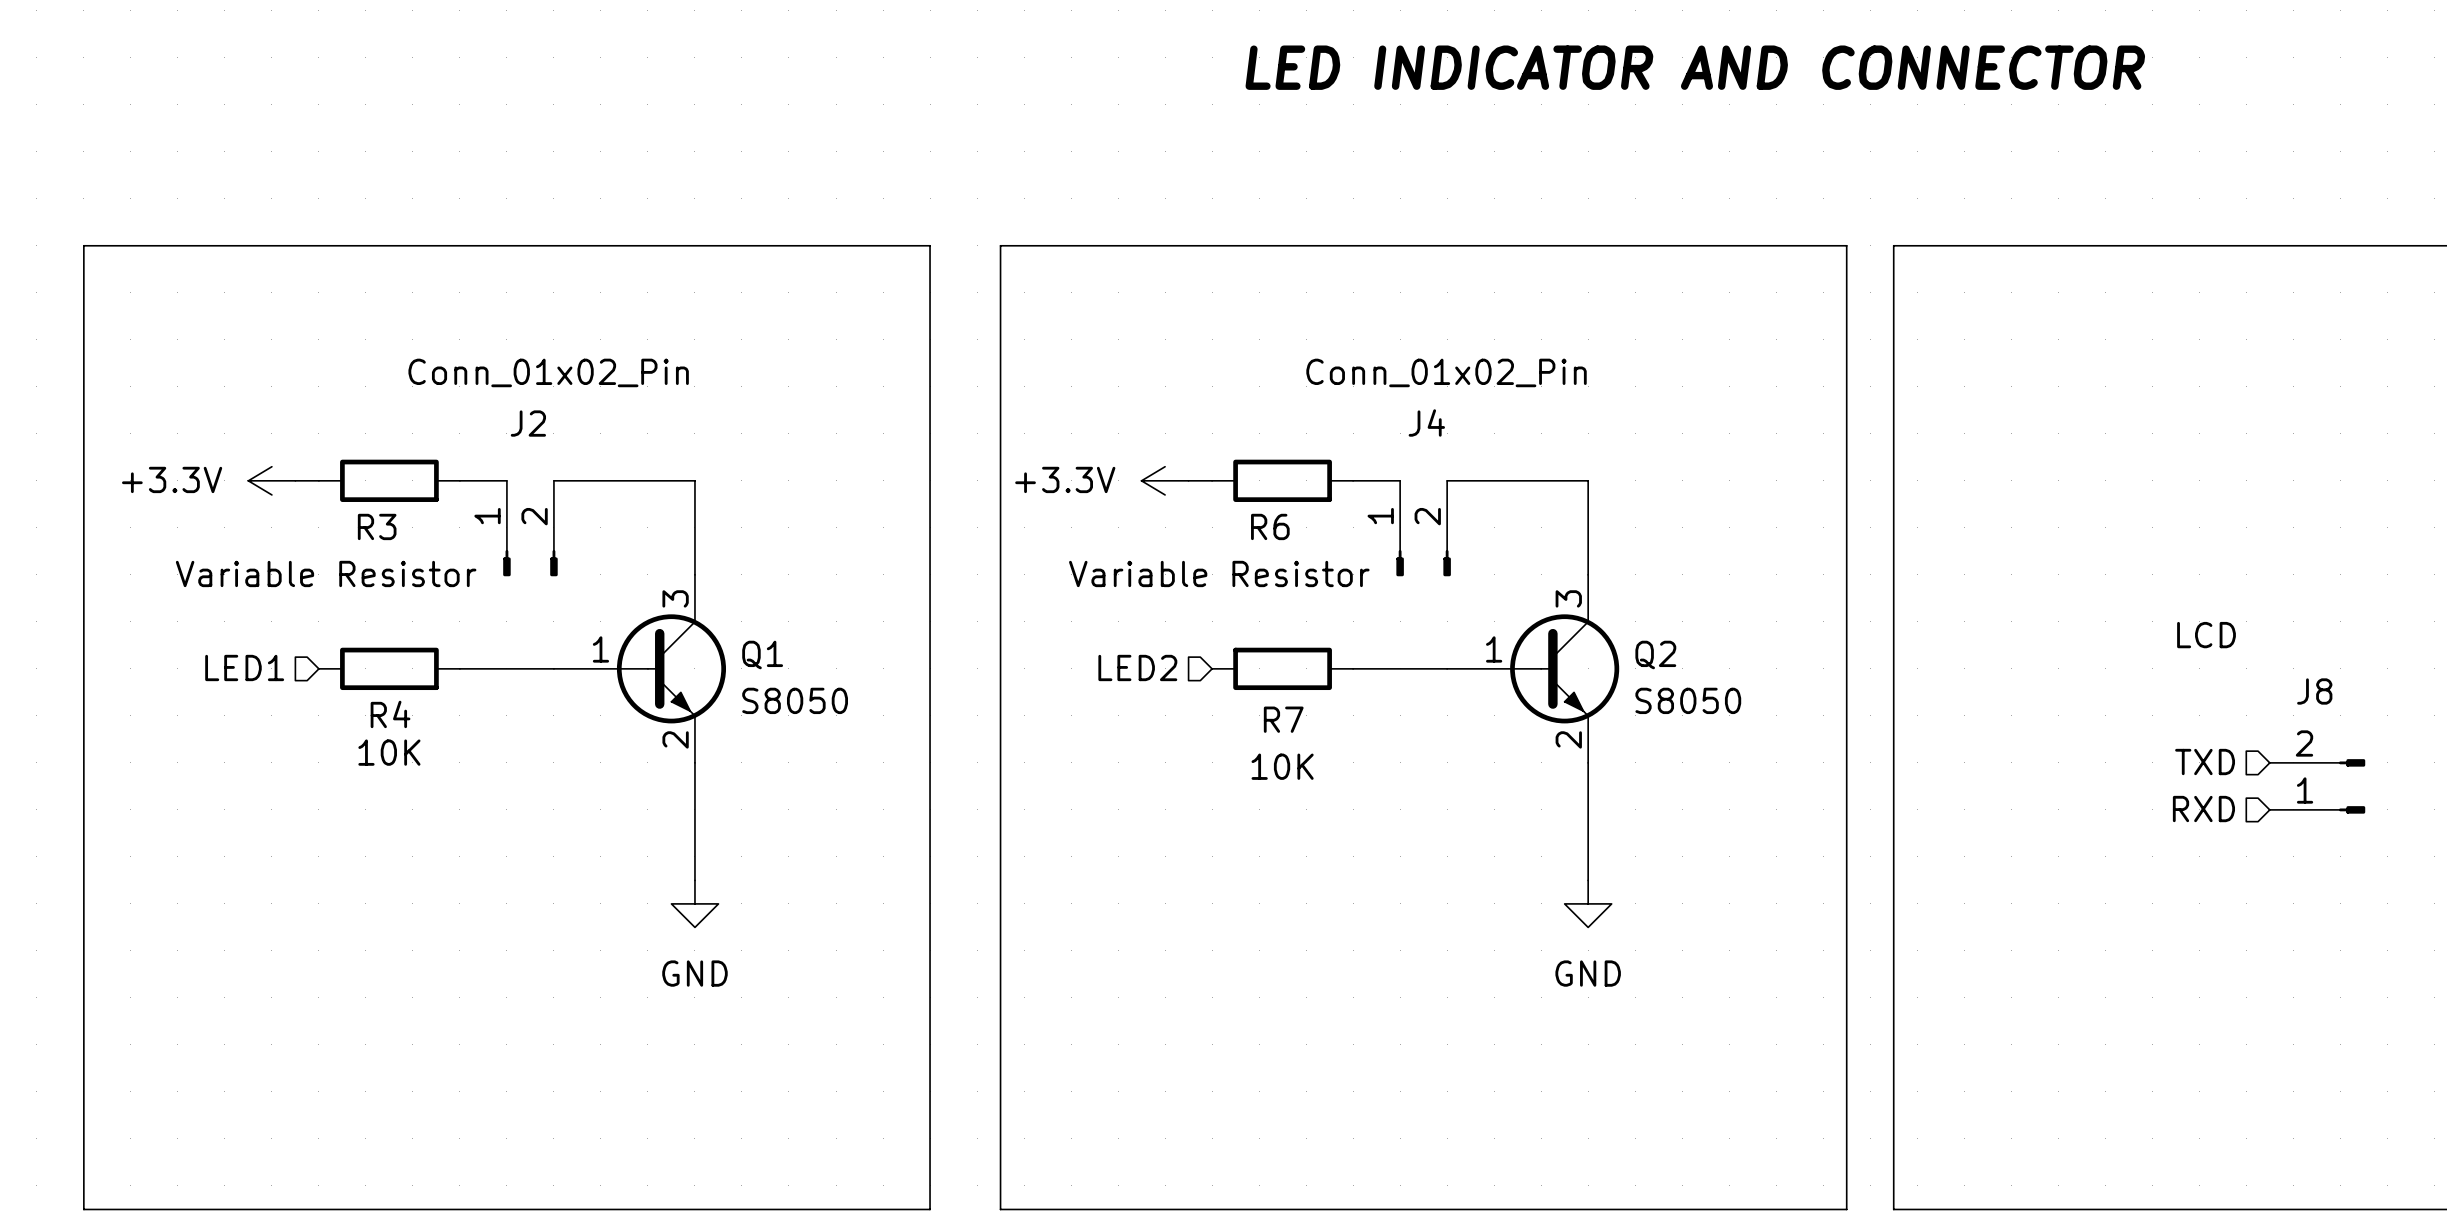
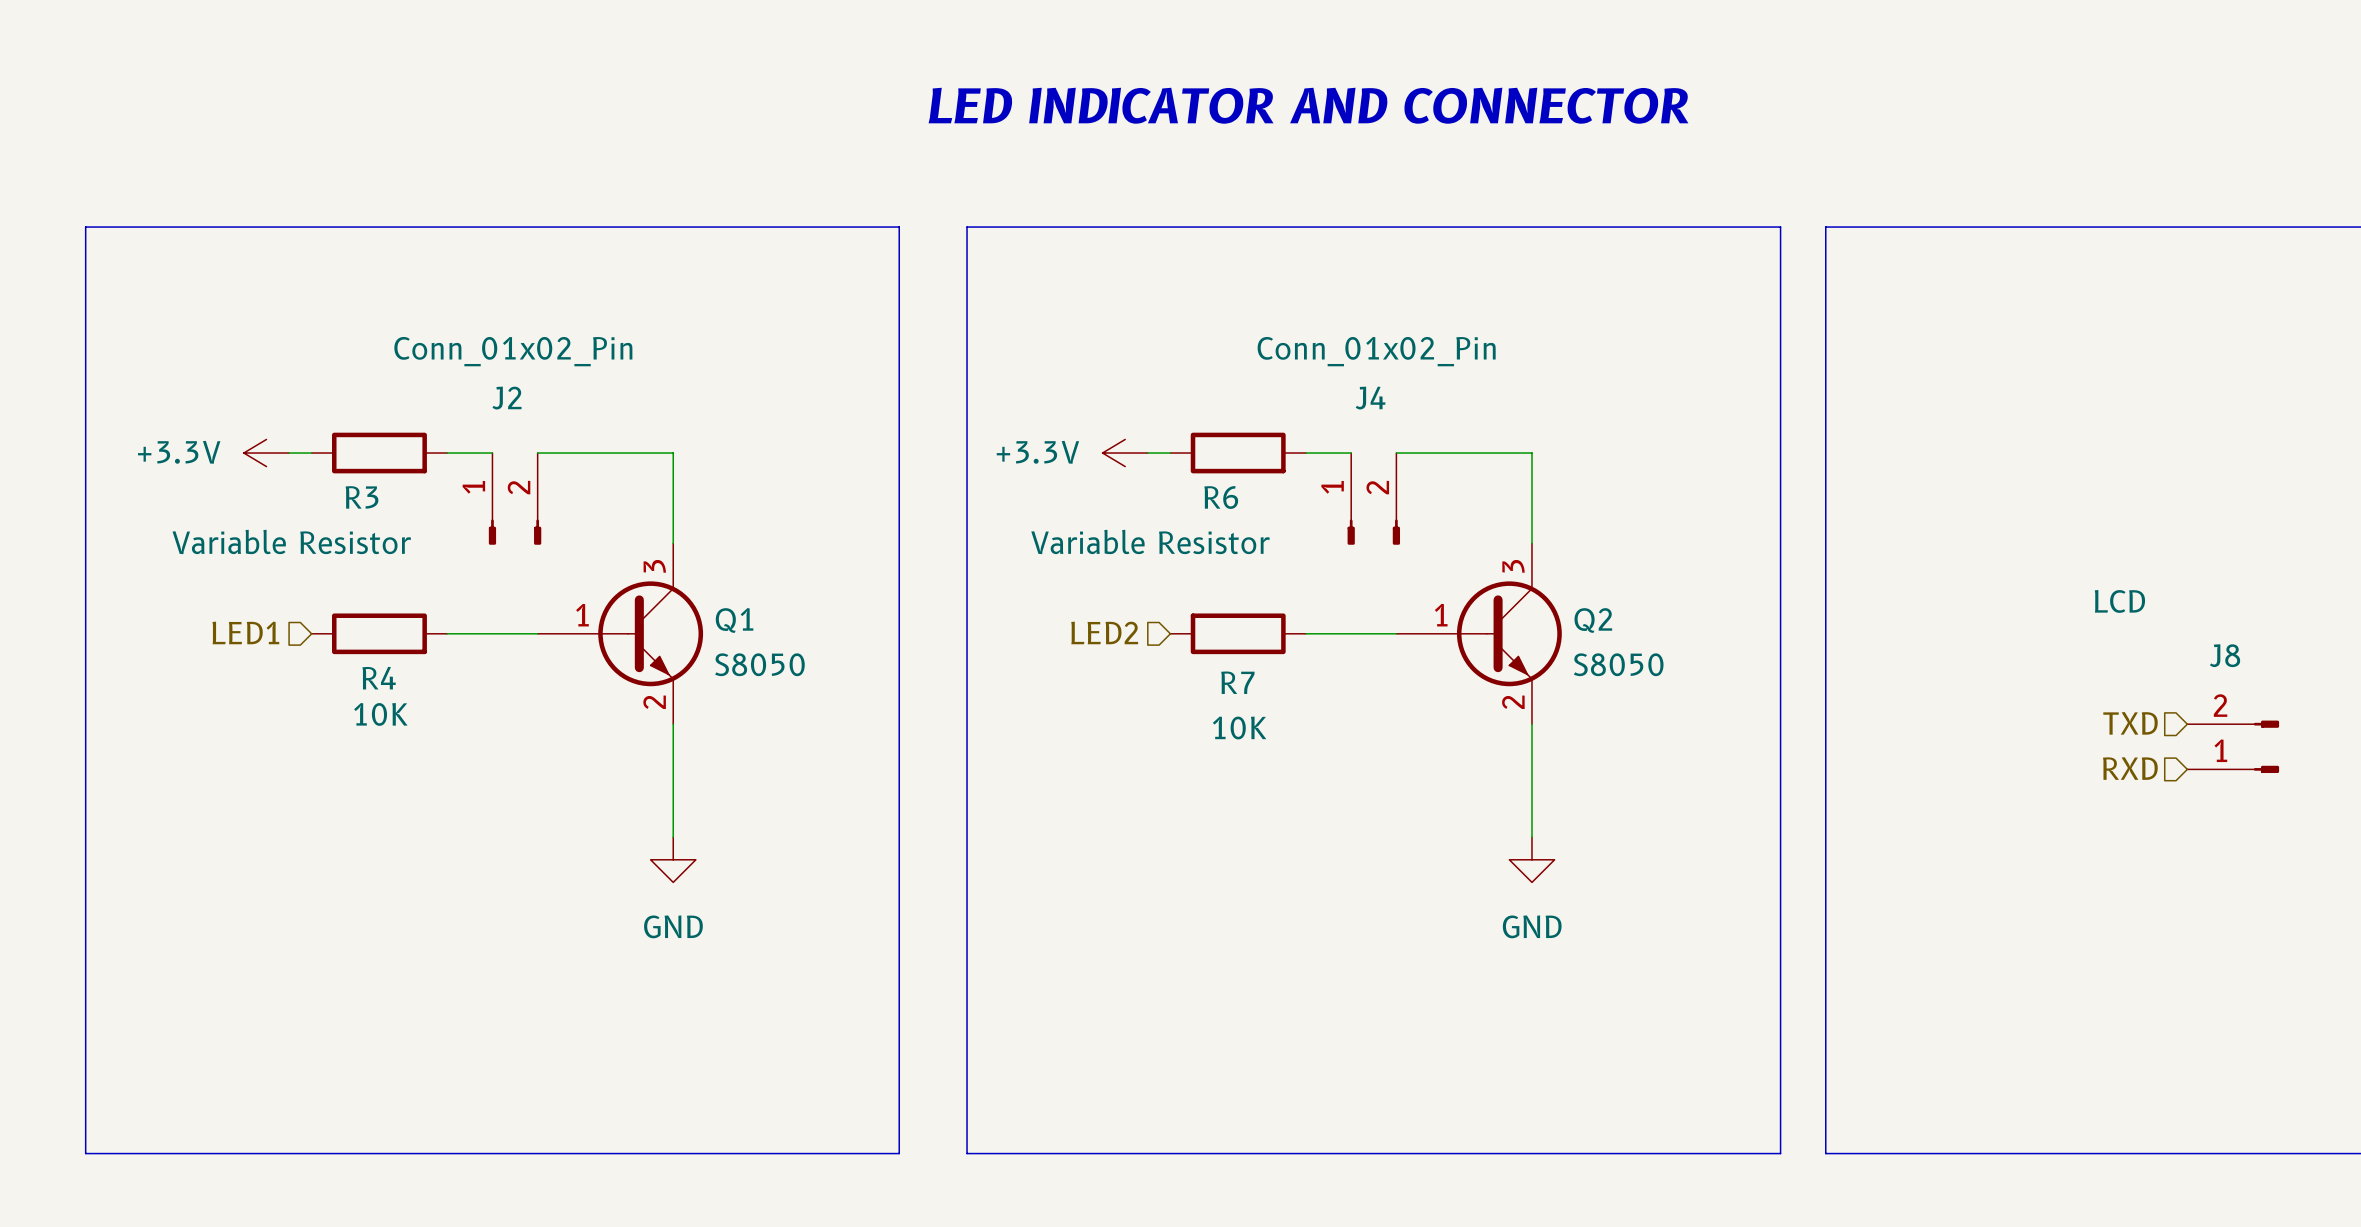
text position: LED INDICATOR AND CONNECTOR (1695, 67) -> LED INDICATOR AND CONNECTOR (1308, 105)

